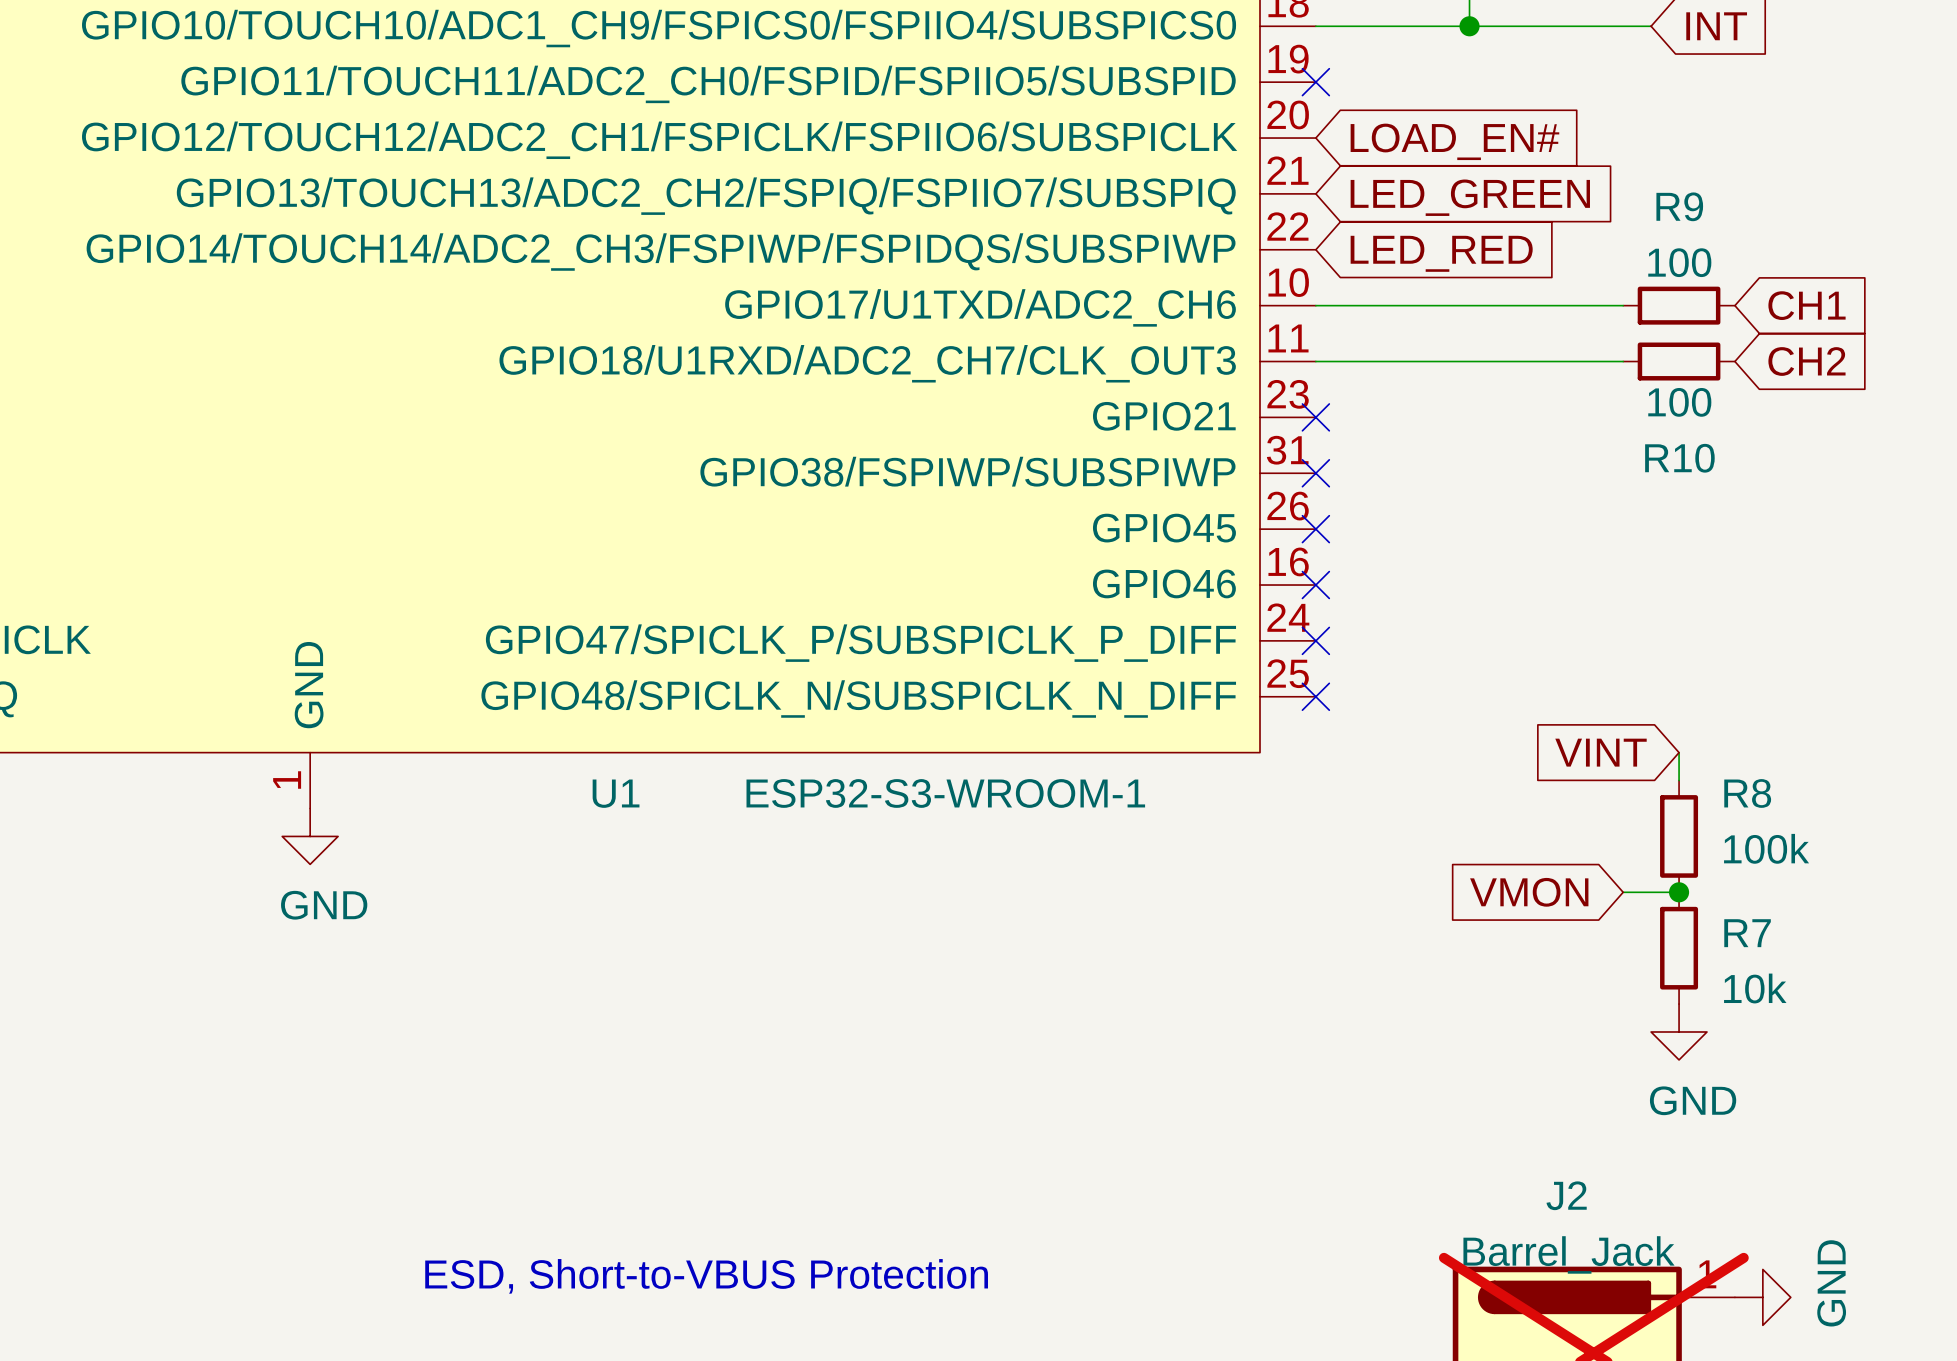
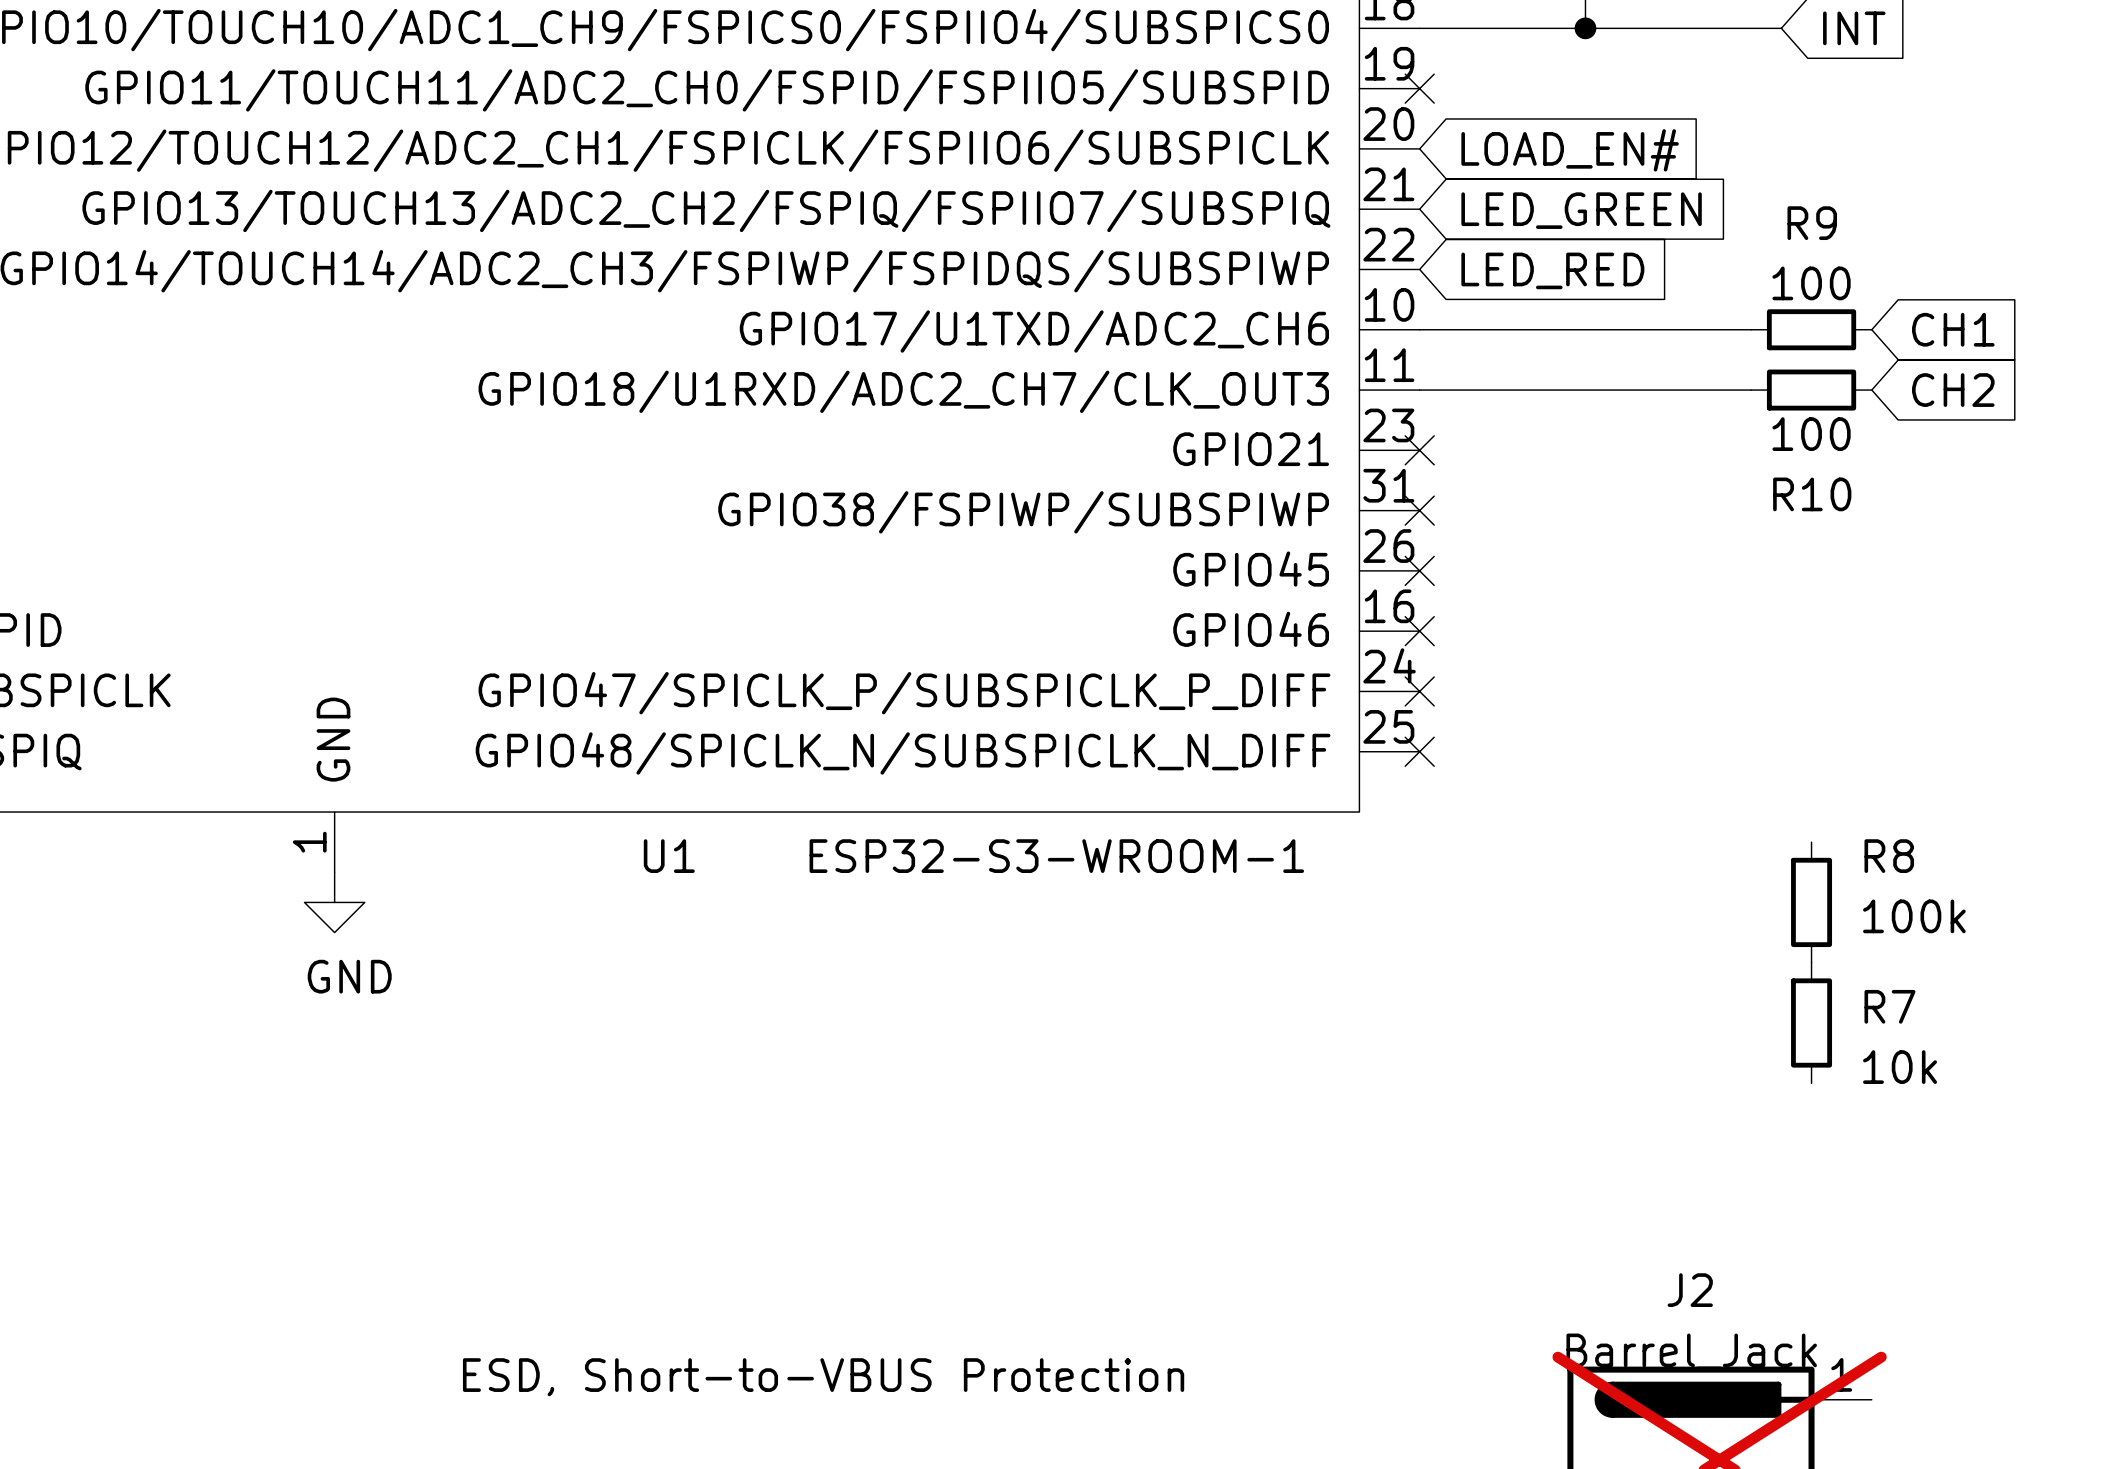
global label: VINT (1600, 752) -> none
wire: (1679, 752) (1679, 780) -> none
global label: VMON (1529, 892) -> none
wire: (1623, 892) (1679, 892) -> none
junction: (1679, 892) -> none
power symbol: GND (1679, 1031) -> none
power symbol: GND (1762, 1297) -> none

